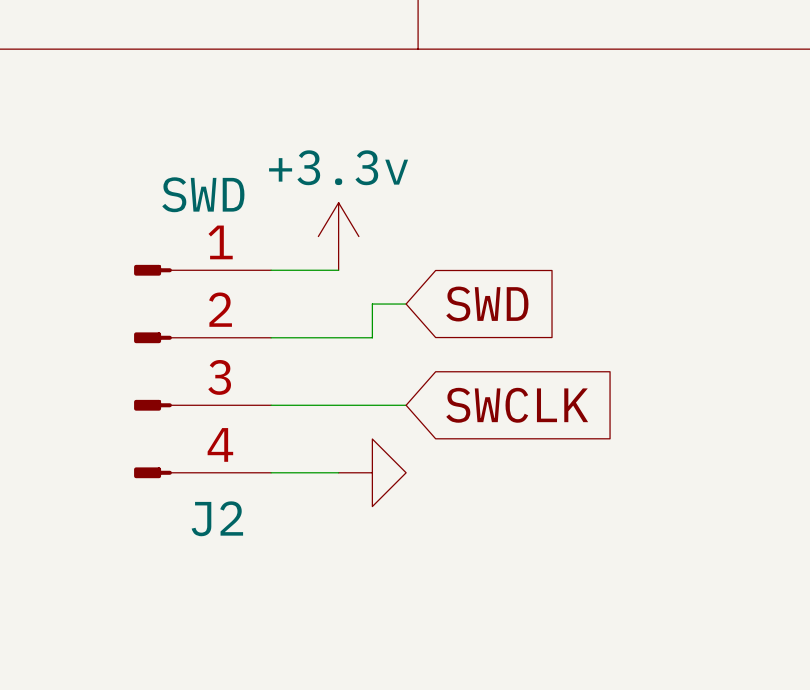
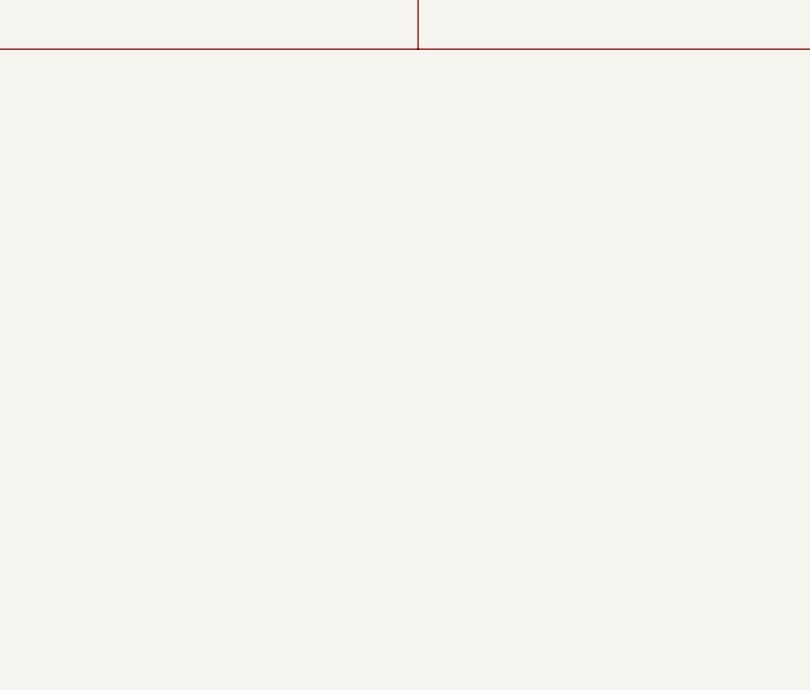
power symbol: +3.3v (338, 236) -> none
wire: (271, 270) (338, 270) -> none
wire: (406, 304) (372, 304) (372, 337) (271, 337) -> none
global label: SWD (487, 304) -> none
J2: SWD (202, 371) -> none
wire: (271, 405) (406, 405) -> none
global label: SWCLK (517, 405) -> none
wire: (271, 472) (338, 472) -> none
power symbol: (372, 472) -> none

